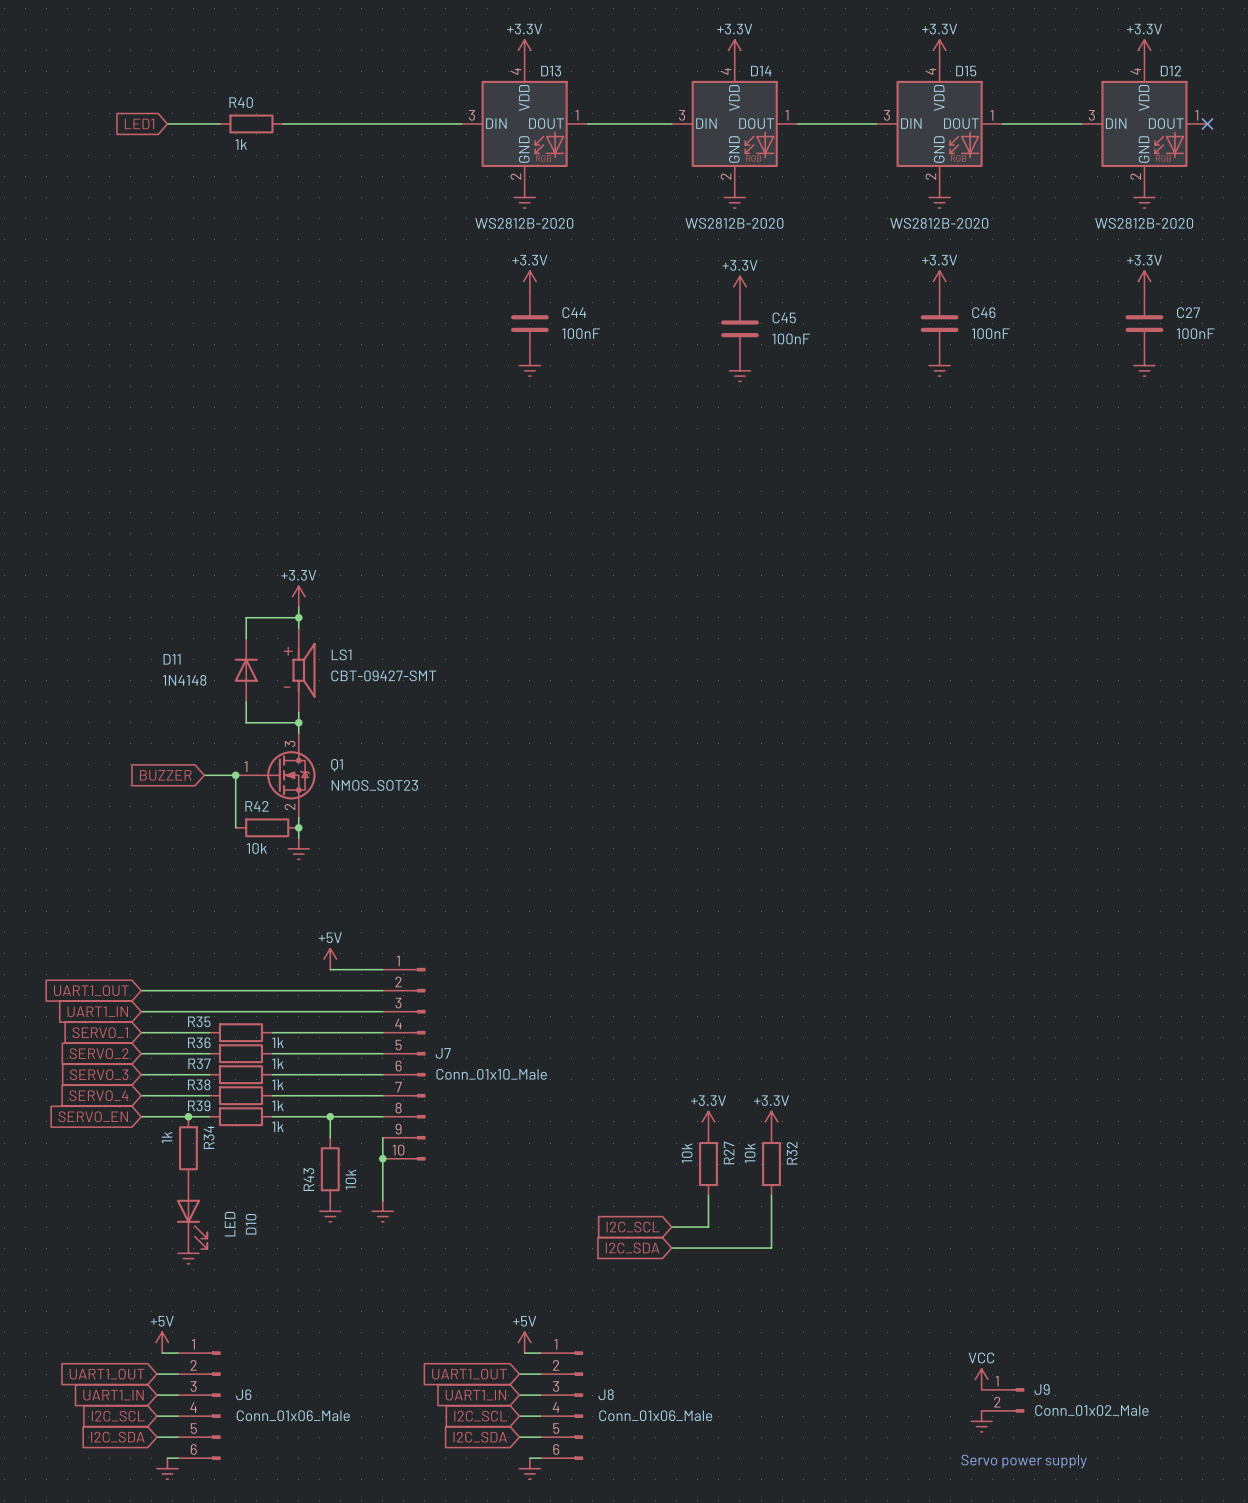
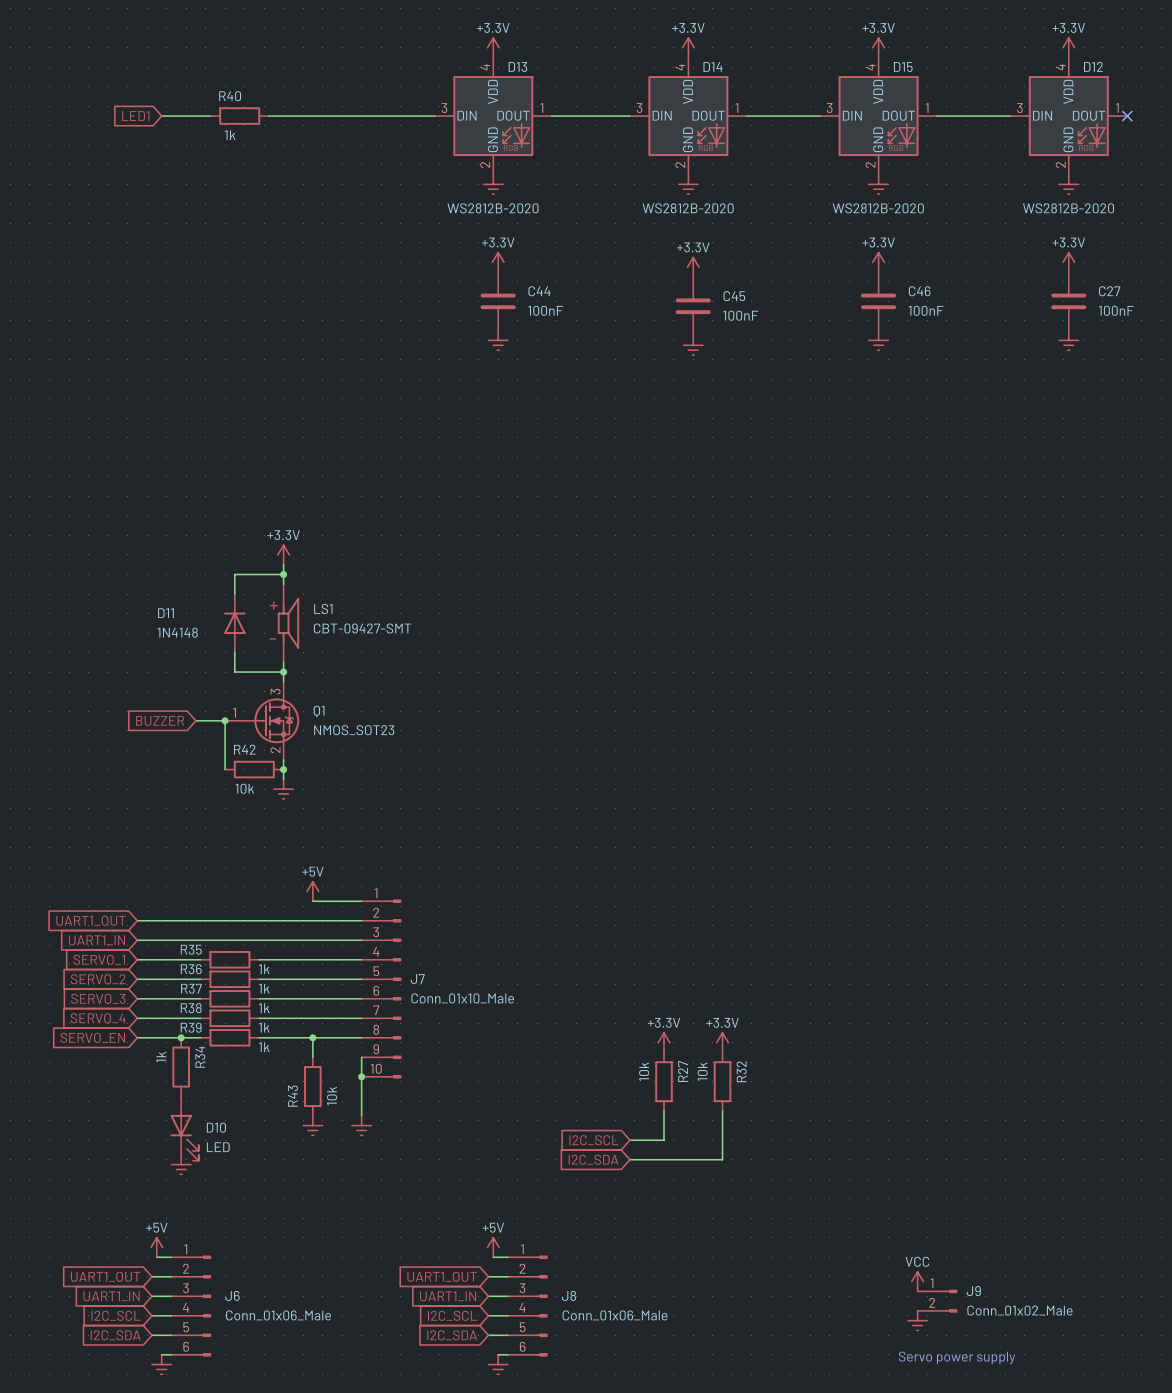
D10 value rotation: 0° (230, 1224) -> 90° clockwise (218, 1147)
D10 name rotation: 0° (251, 1224) -> 90° clockwise (216, 1127)

